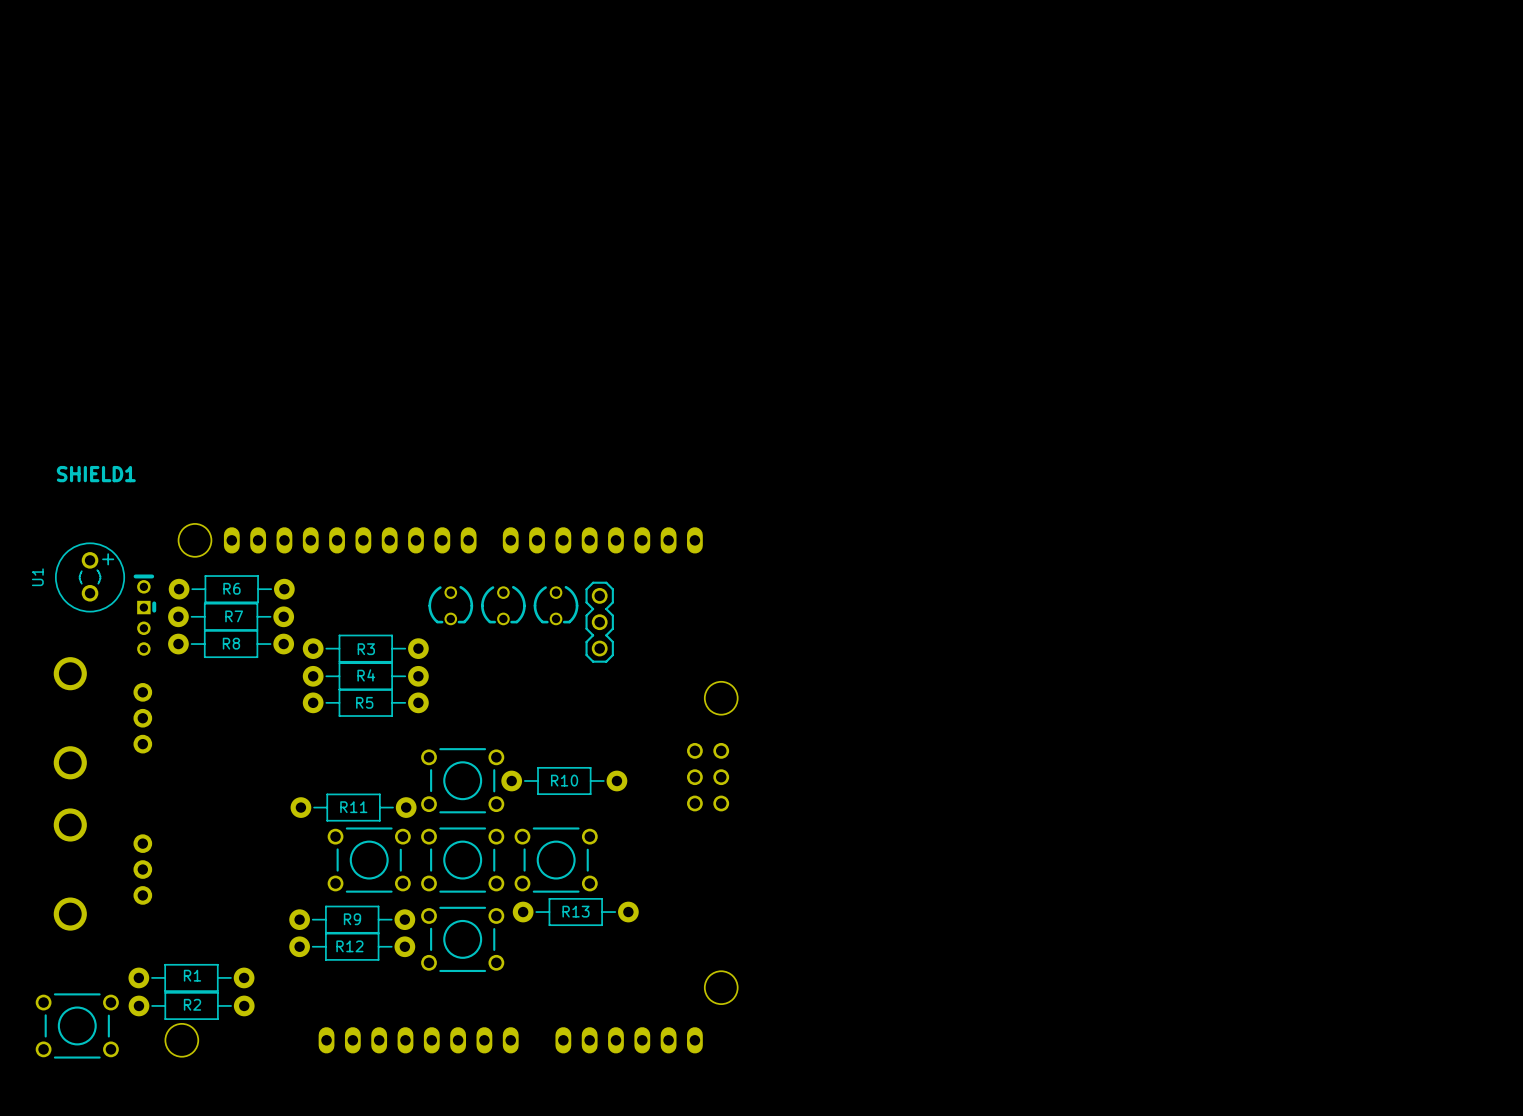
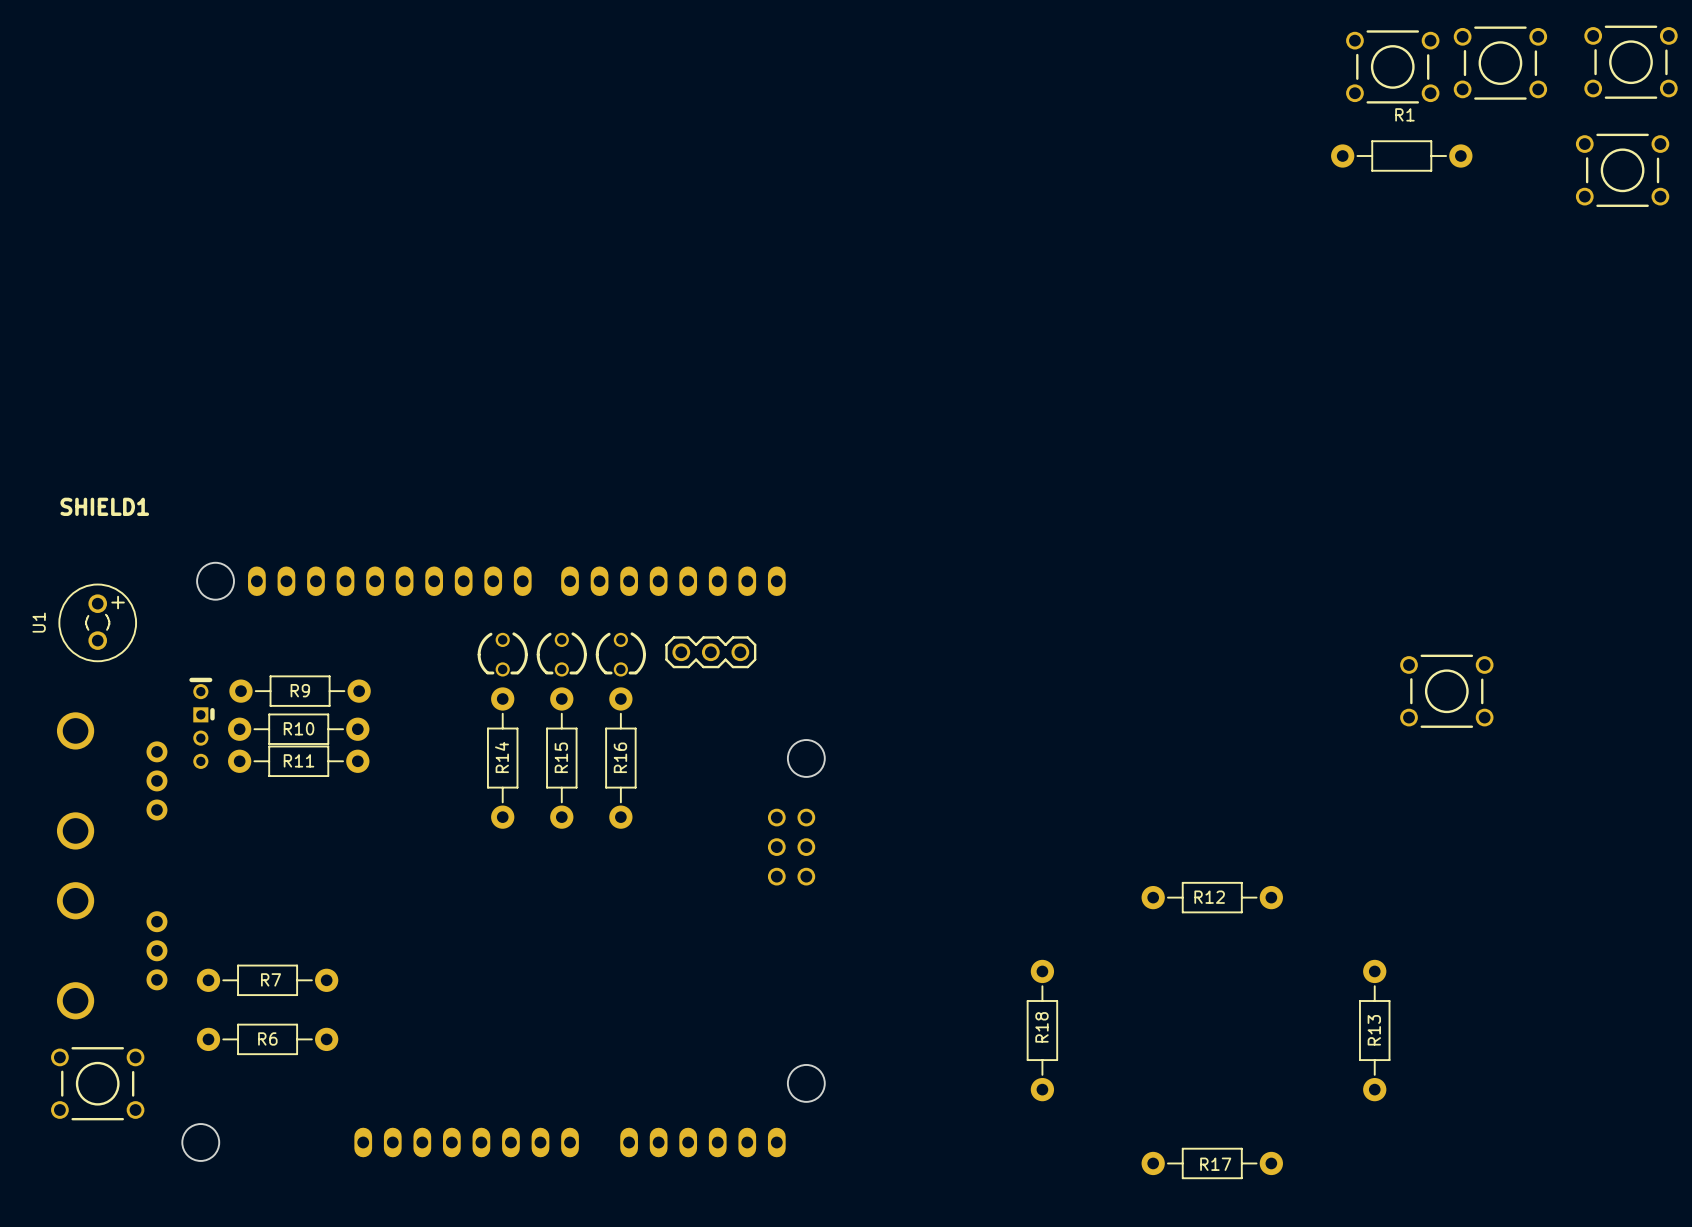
part: none -> (1500, 63)
part: none -> (1631, 62)
part: none -> (1392, 66)
part: none -> (1622, 170)
R6 position: (231, 589) -> (267, 1039)
part position: (144, 615) -> (202, 723)
R7 position: (231, 616) -> (267, 980)
part rotation: 0° (599, 622) -> 90° clockwise (710, 652)
part: none -> (1446, 691)
R8: (231, 644) -> none
R3: (365, 648) -> none
R4: (365, 676) -> none
R14: none -> (502, 758)
R15: none -> (561, 758)
R16: none -> (620, 758)
R5: (365, 702) -> none
part: (462, 780) -> none
R10 position: (564, 780) -> (298, 729)
R11 position: (353, 807) -> (298, 761)
part: (369, 860) -> none
part: (462, 860) -> none
part: (556, 860) -> none
R13 rotation: 0° (575, 912) -> 90° clockwise (1374, 1030)
R13 position: (575, 912) -> (1374, 1030)
R9 position: (352, 919) -> (300, 691)
part: (462, 939) -> none
R18: none -> (1042, 1030)
R12 position: (352, 946) -> (1212, 897)
R1 name position: R1 (192, 975) -> R1 (1404, 114)
R1 position: (191, 977) -> (1401, 156)
R2: (191, 1005) -> none
part position: (77, 1025) -> (97, 1083)
R17: none -> (1212, 1163)

